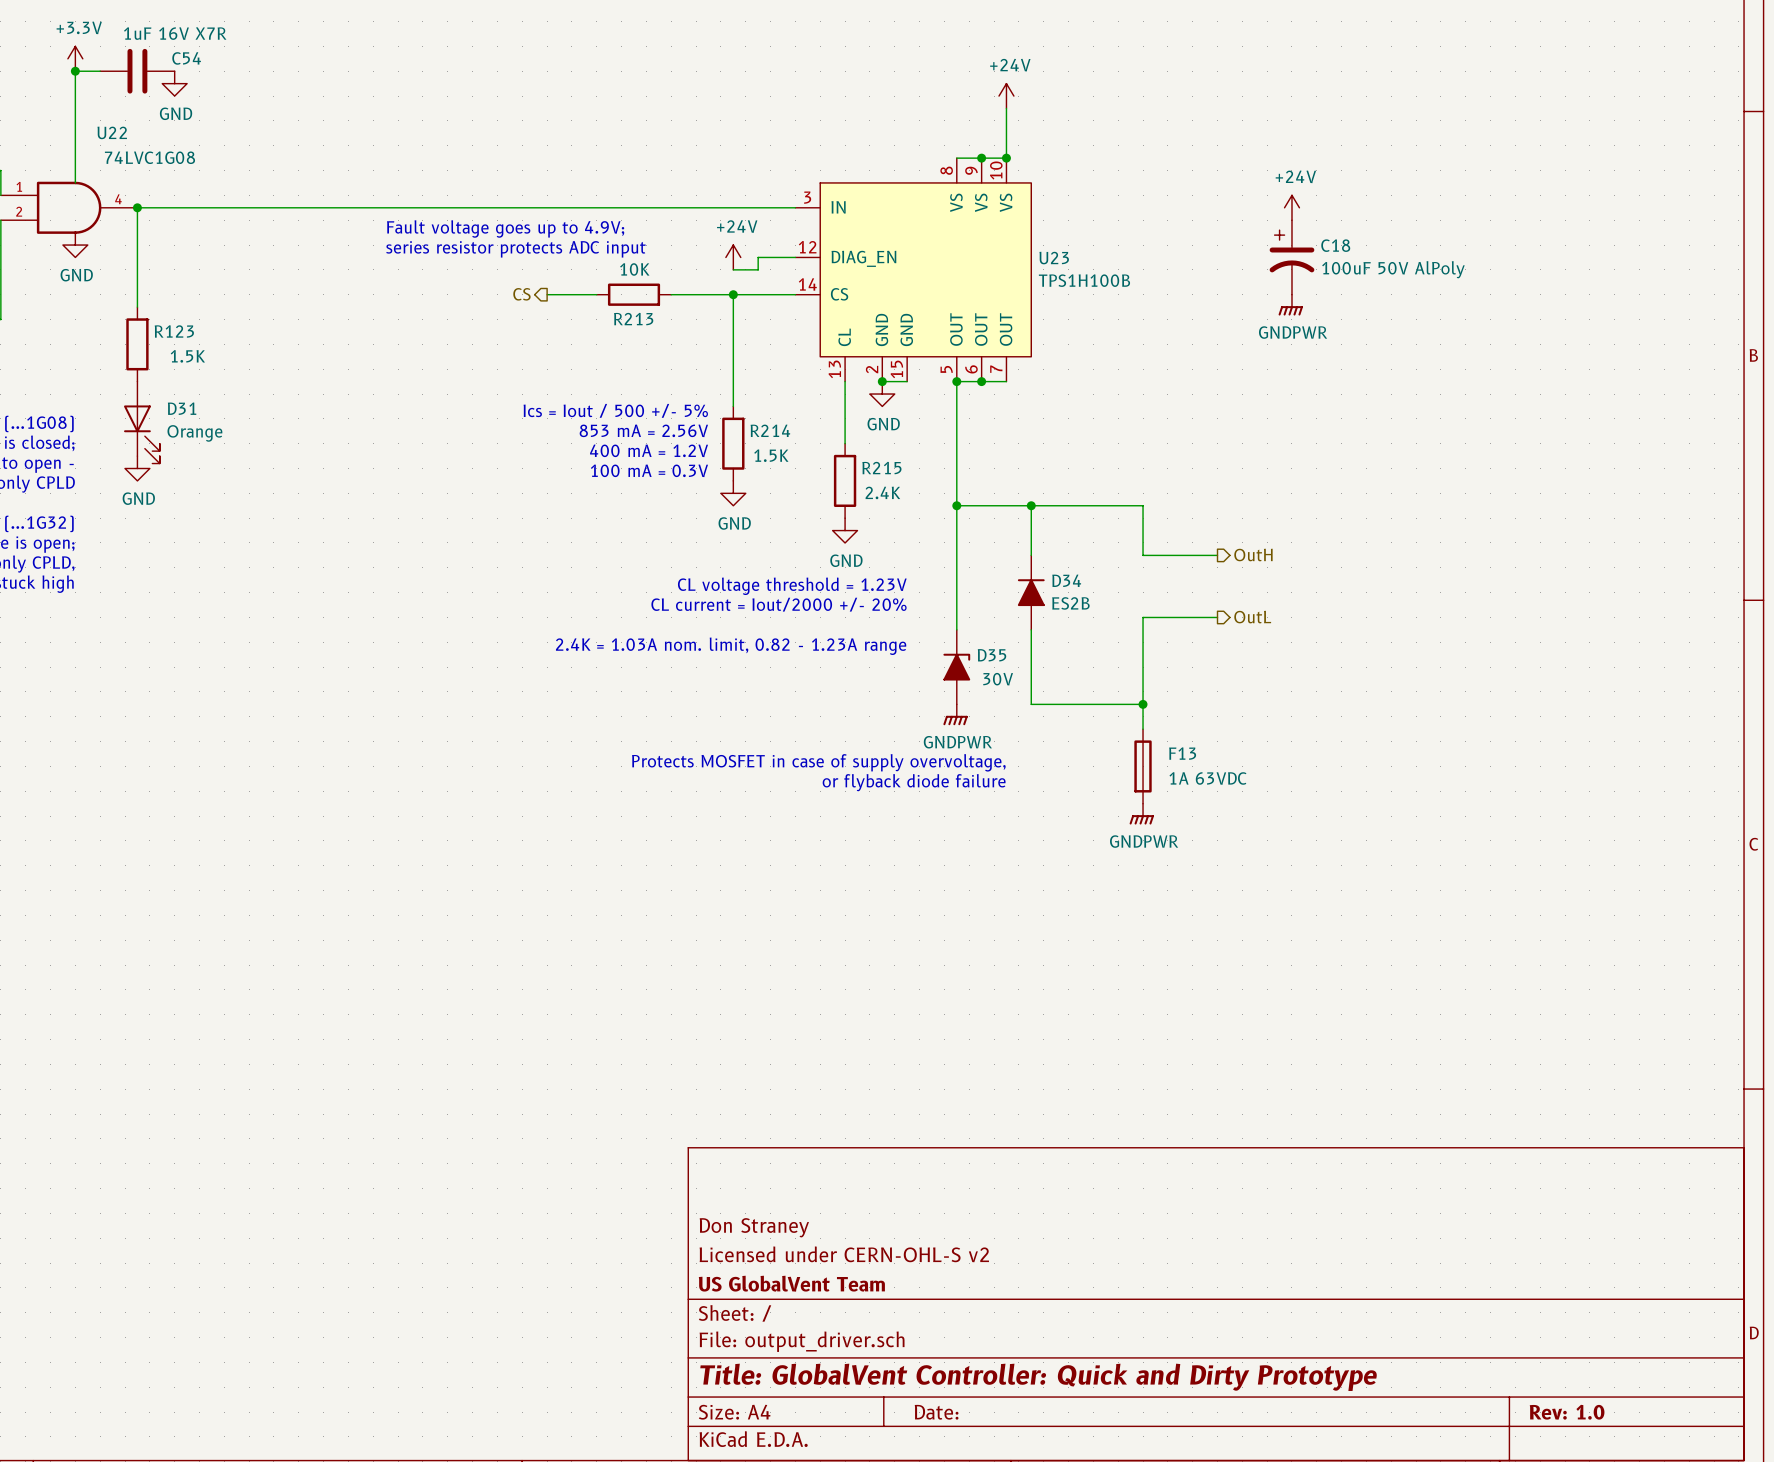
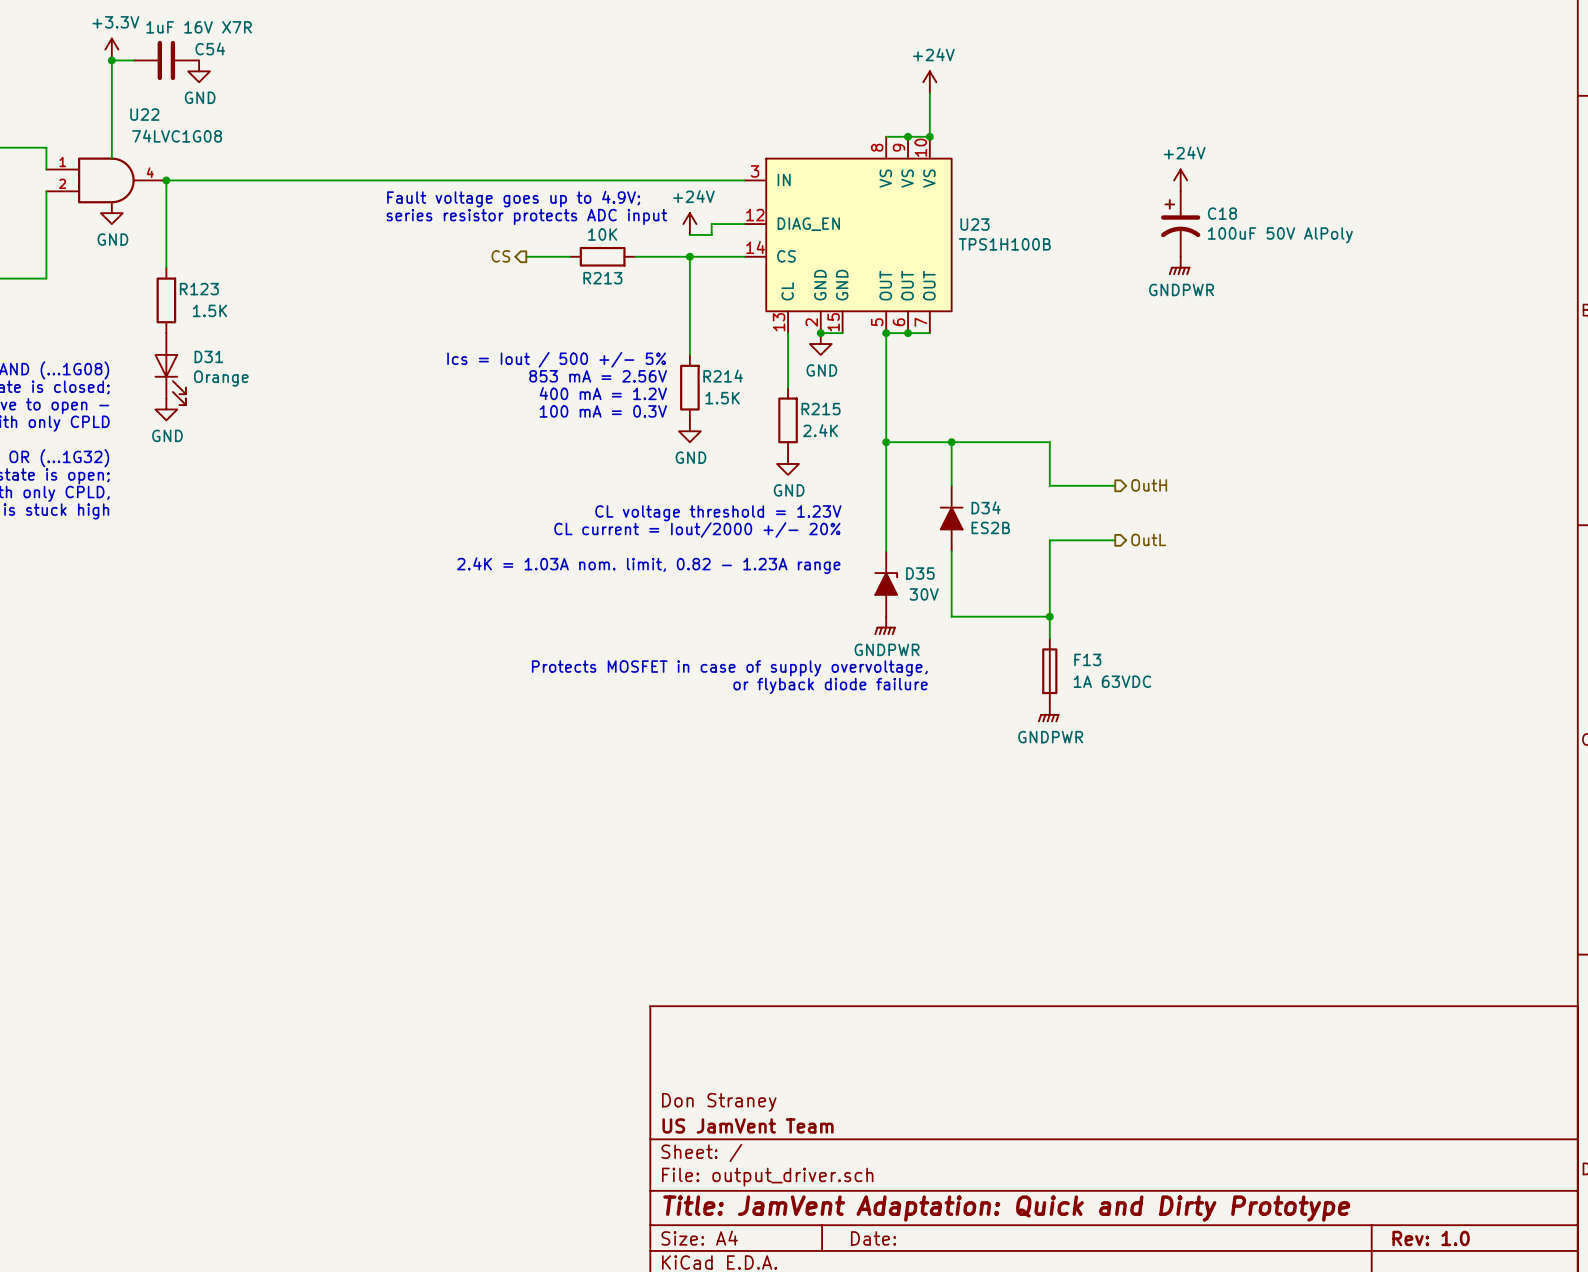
title block: Don Straney (754, 1227) -> none
title block: Licensed under CERN-OHL-S v2 (844, 1254) -> Don Straney (719, 1102)
title block: US GlobalVent Team (791, 1283) -> US JamVent Team (748, 1125)
title block: Title: GlobalVent Controller: Quick and Dirty Prototype (1038, 1377) -> Title: JamVent Adaptation: Quick and Dirty Prototype (1006, 1208)

